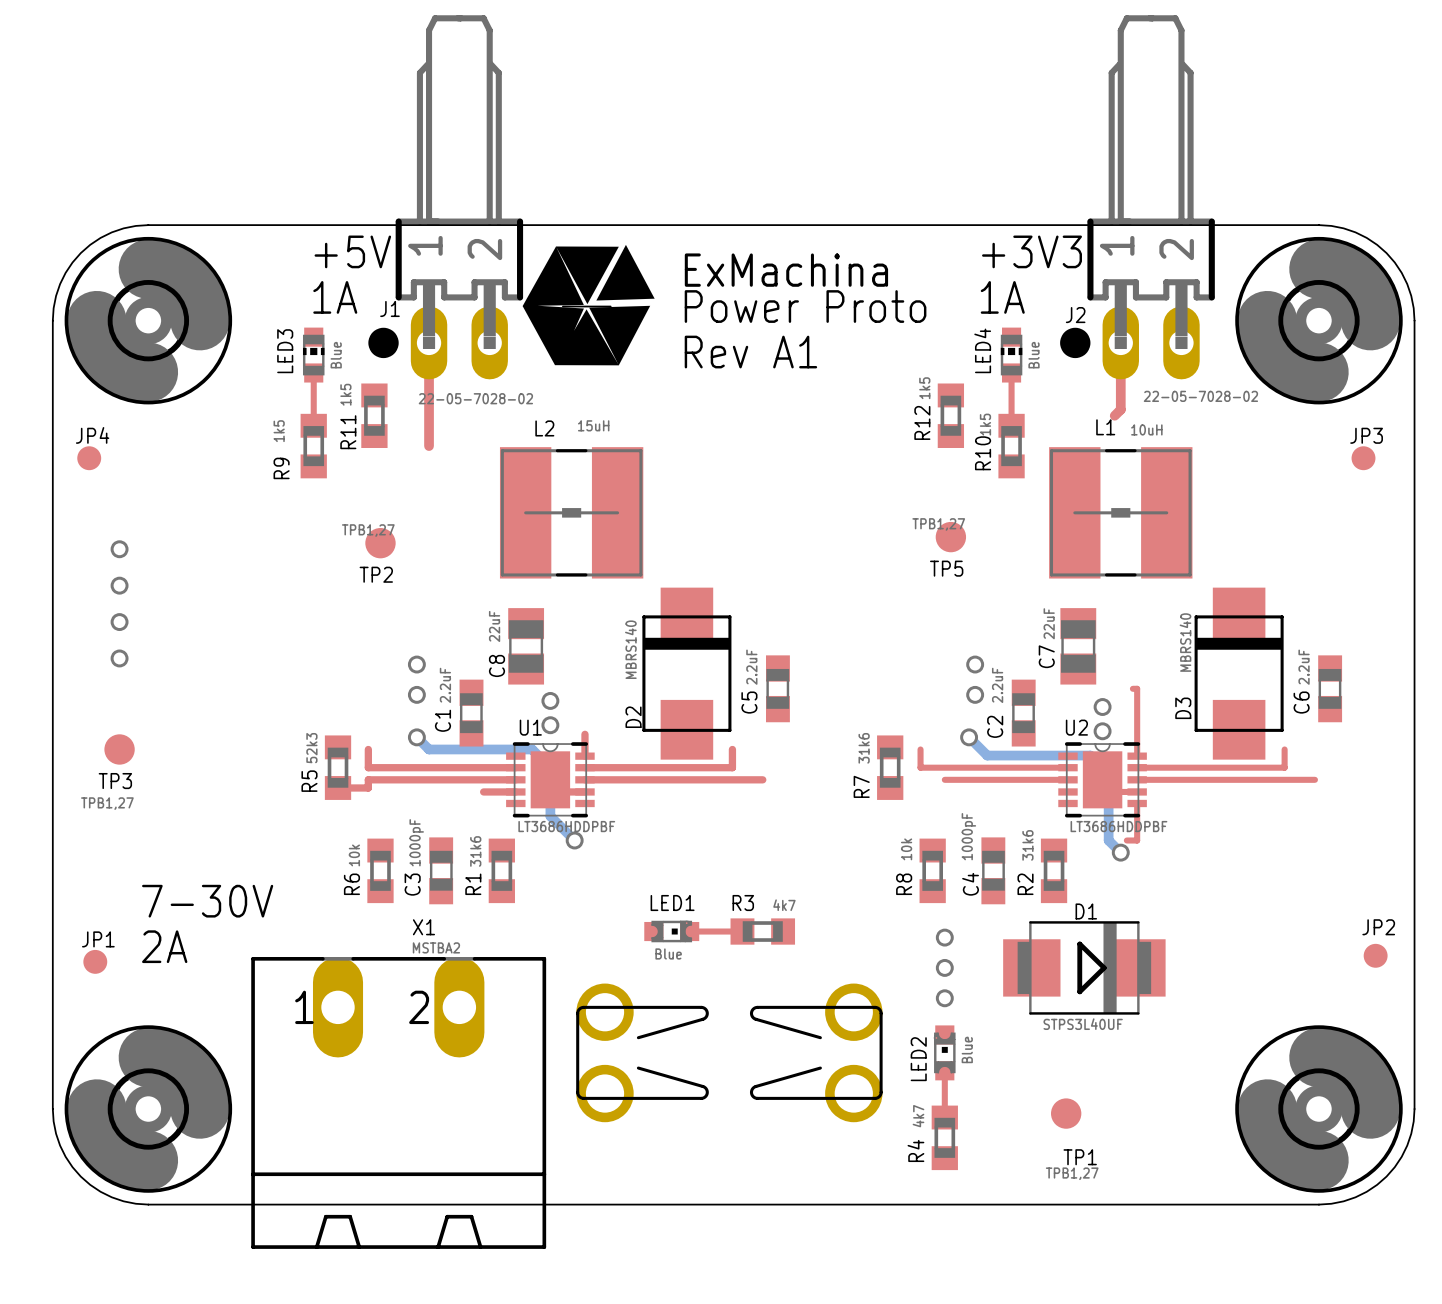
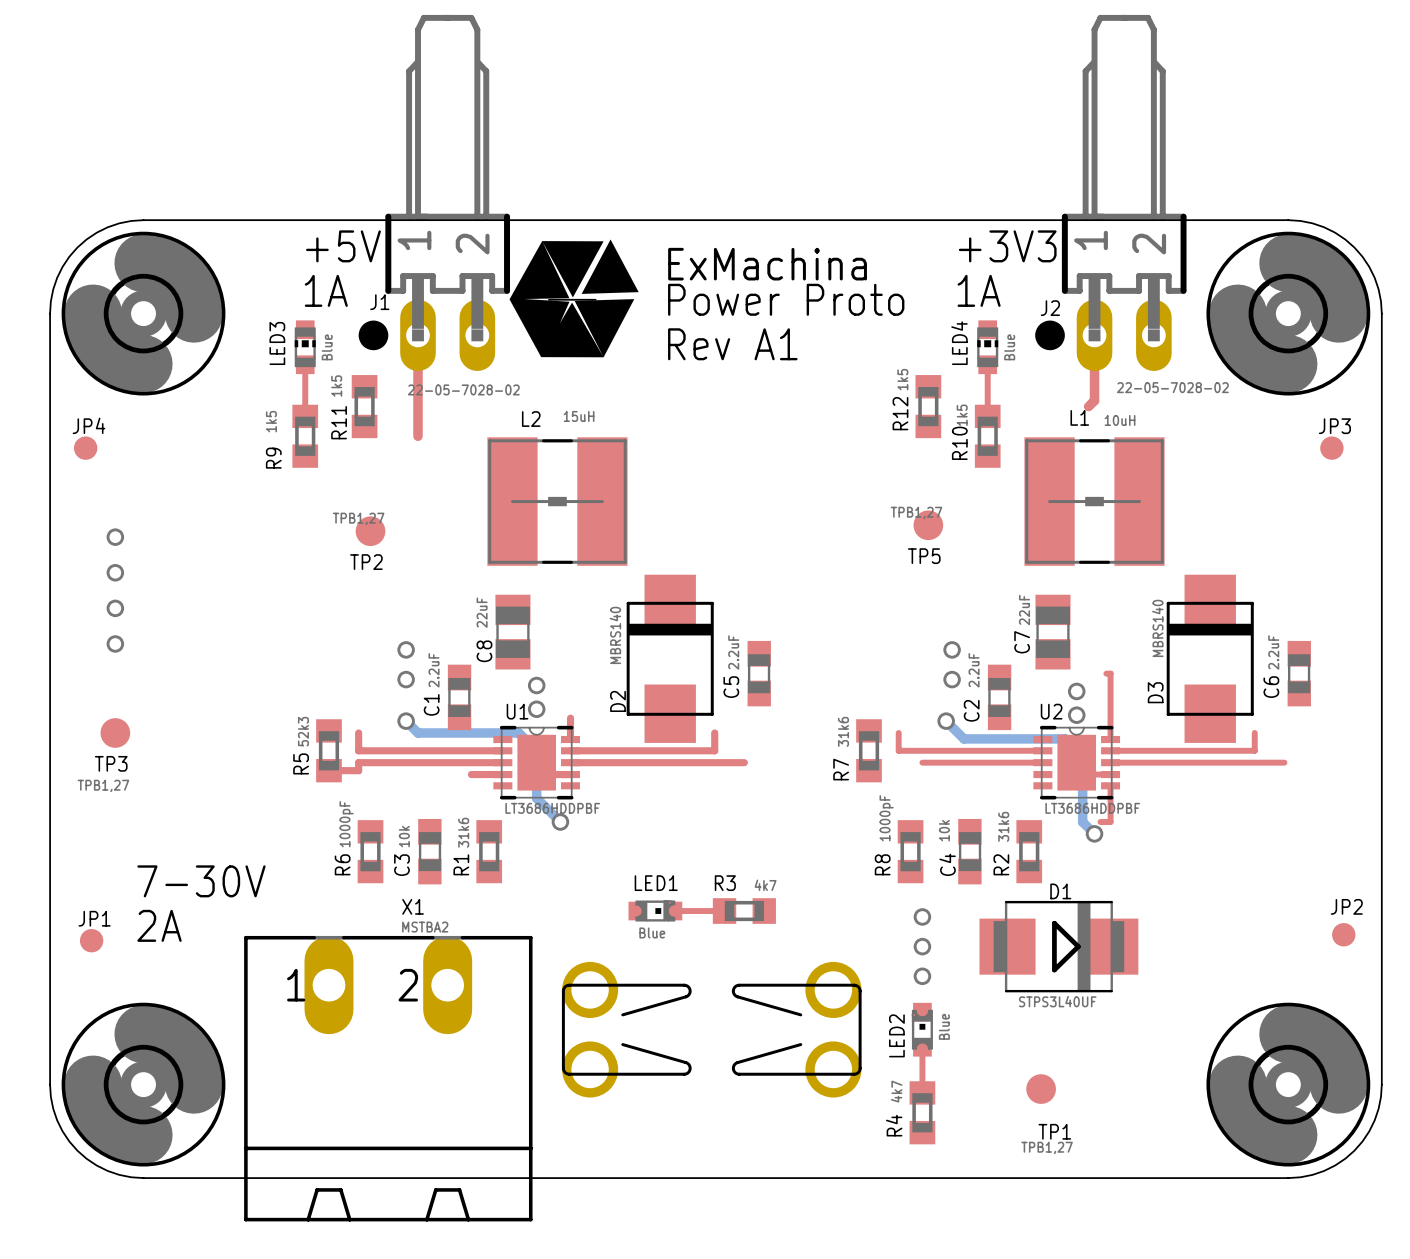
C4 value position: 1000pF (968, 836) -> 1000pF (886, 818)
C3 value position: 1000pF (416, 842) -> 1000pF (346, 824)
R8 value position: 10k (906, 849) -> 10k (944, 830)
R6 value position: 10k (354, 855) -> 10k (404, 836)

